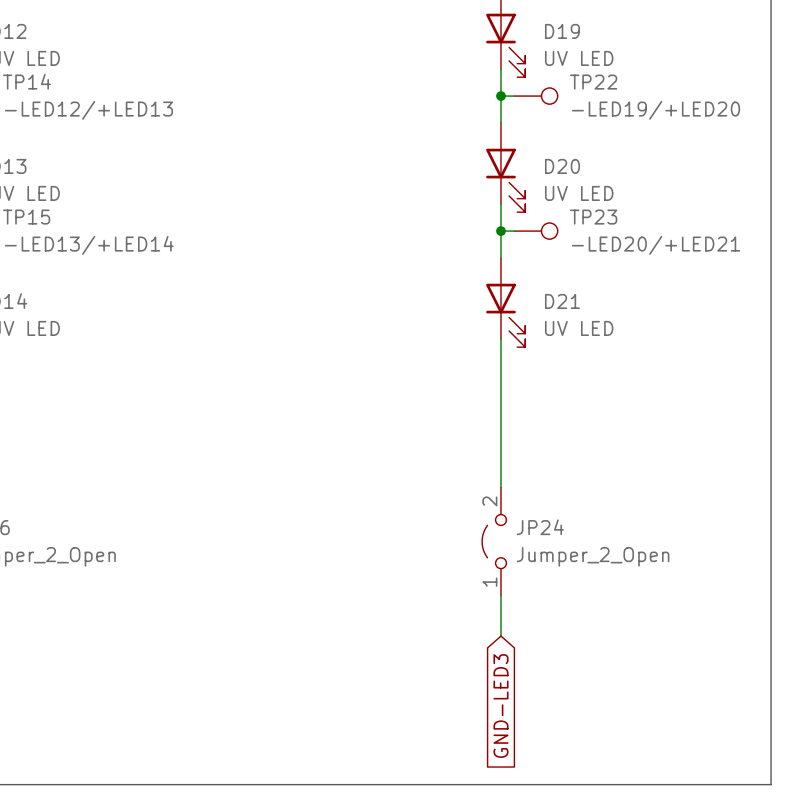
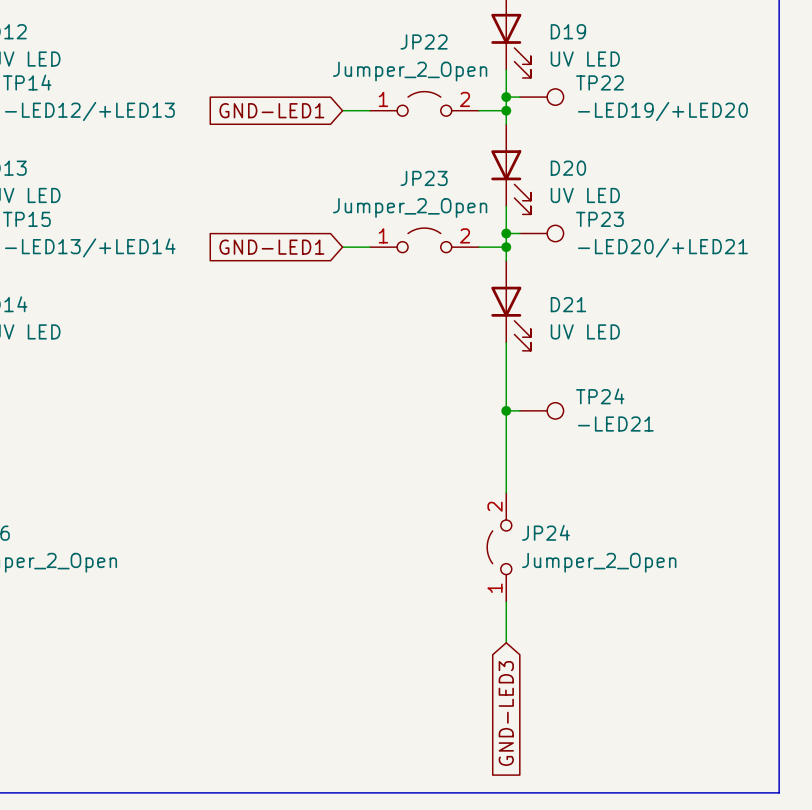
JP22: none -> Jumper_2_Open (424, 103)
global label: none -> GND-LED1 (271, 110)
wire: none -> (342, 110) (369, 110)
wire: none -> (478, 110) (506, 110)
junction: none -> (506, 110)
JP23: none -> Jumper_2_Open (424, 240)
global label: none -> GND-LED1 (271, 247)
wire: none -> (342, 247) (369, 247)
wire: none -> (478, 247) (506, 247)
junction: none -> (506, 247)
wire: none -> (506, 410) (519, 410)
junction: none -> (506, 410)
TP24: none -> -LED21 (541, 410)

